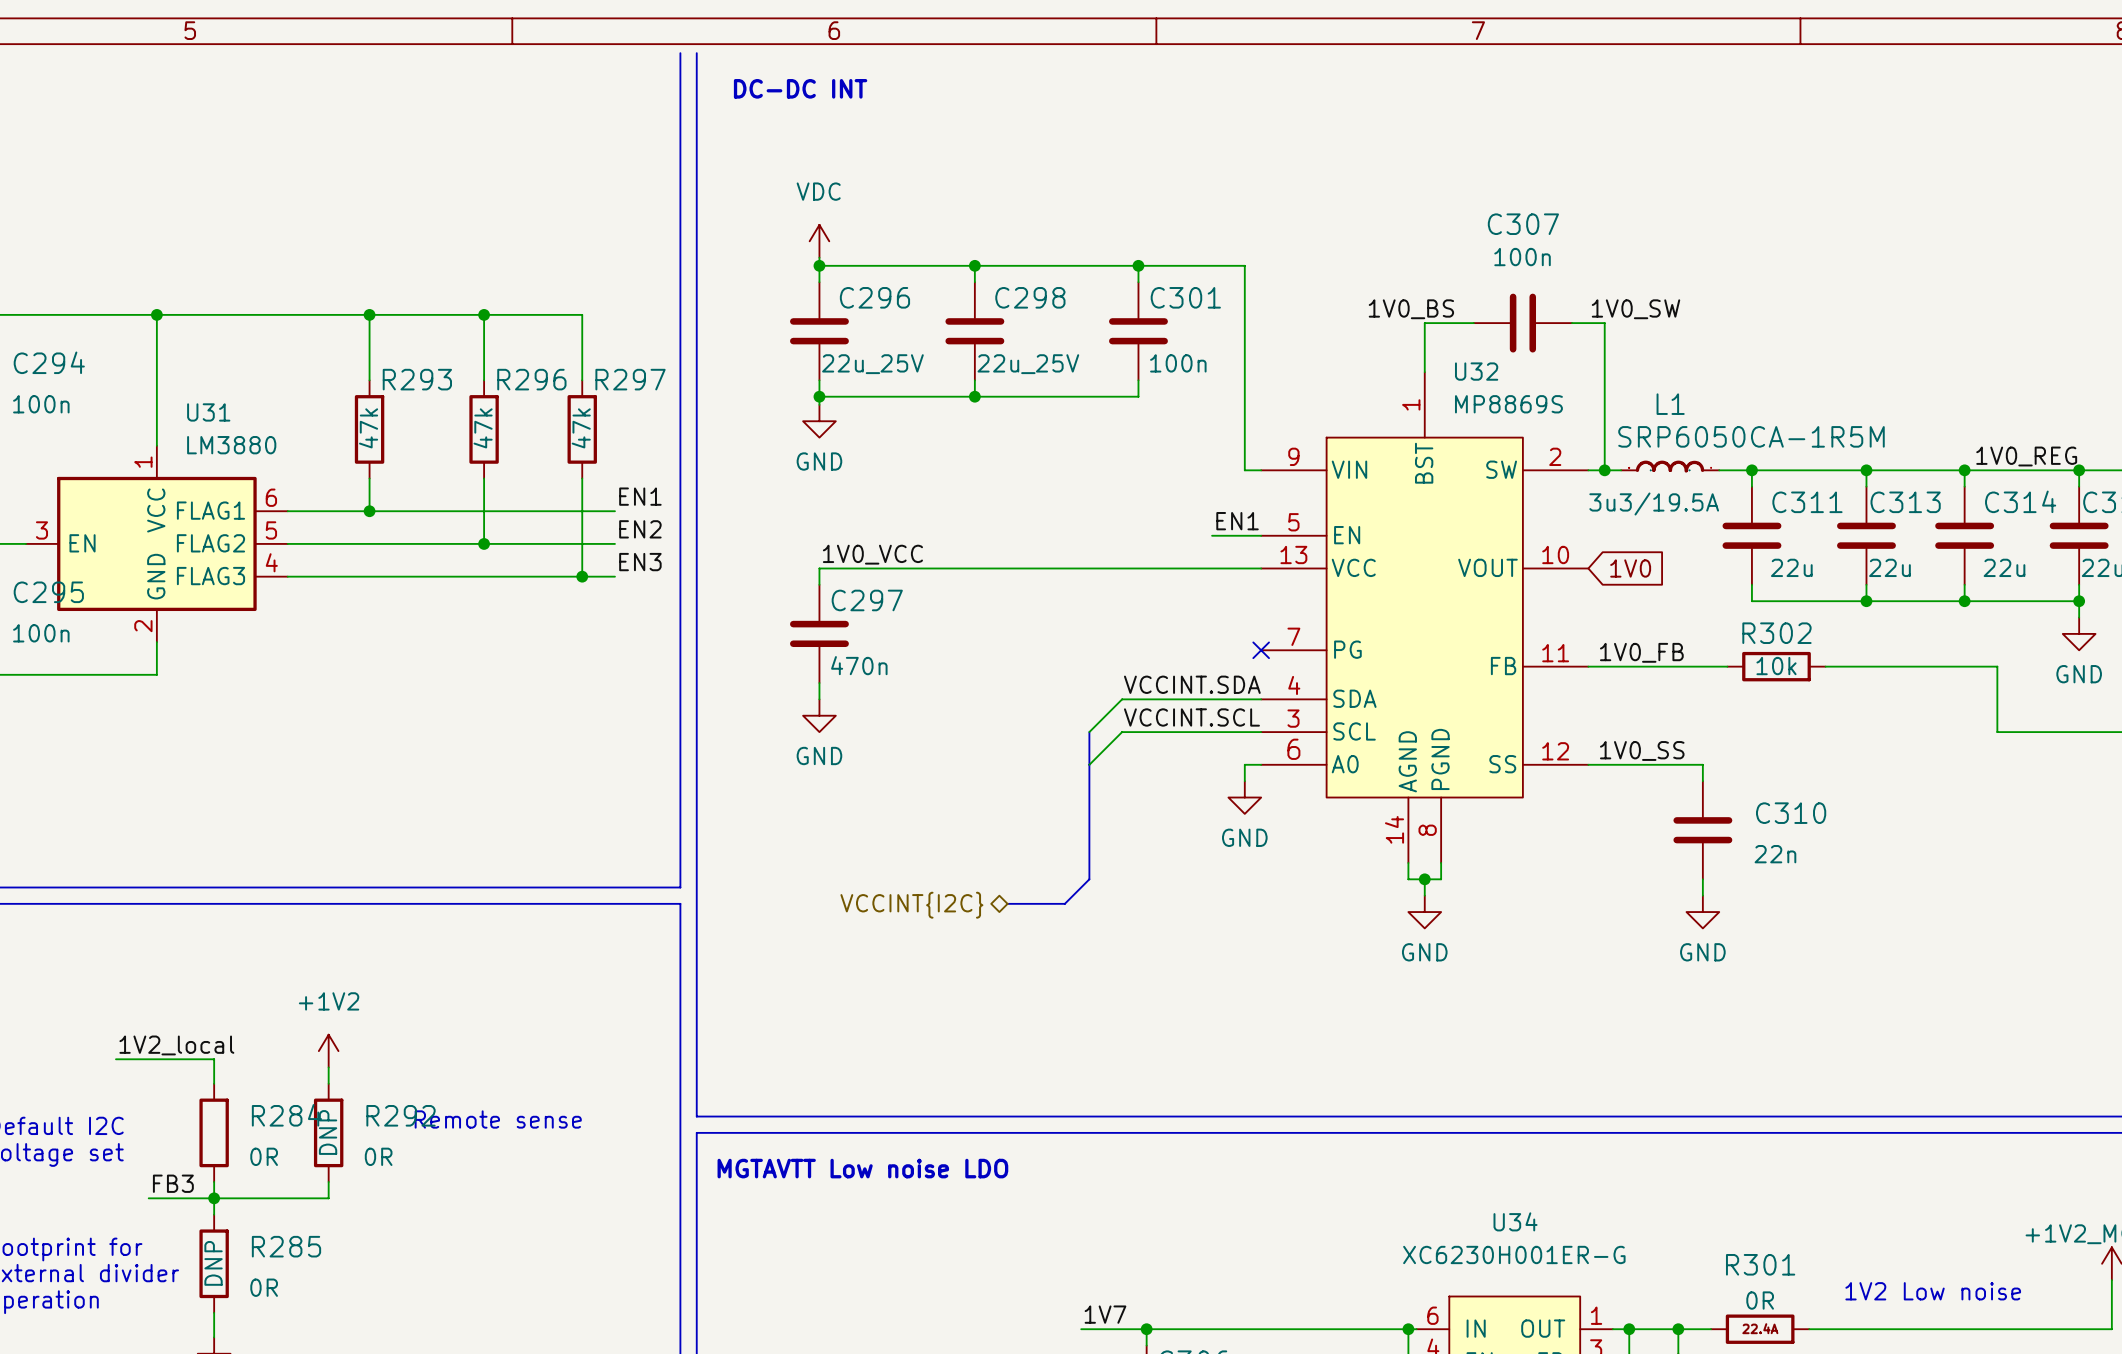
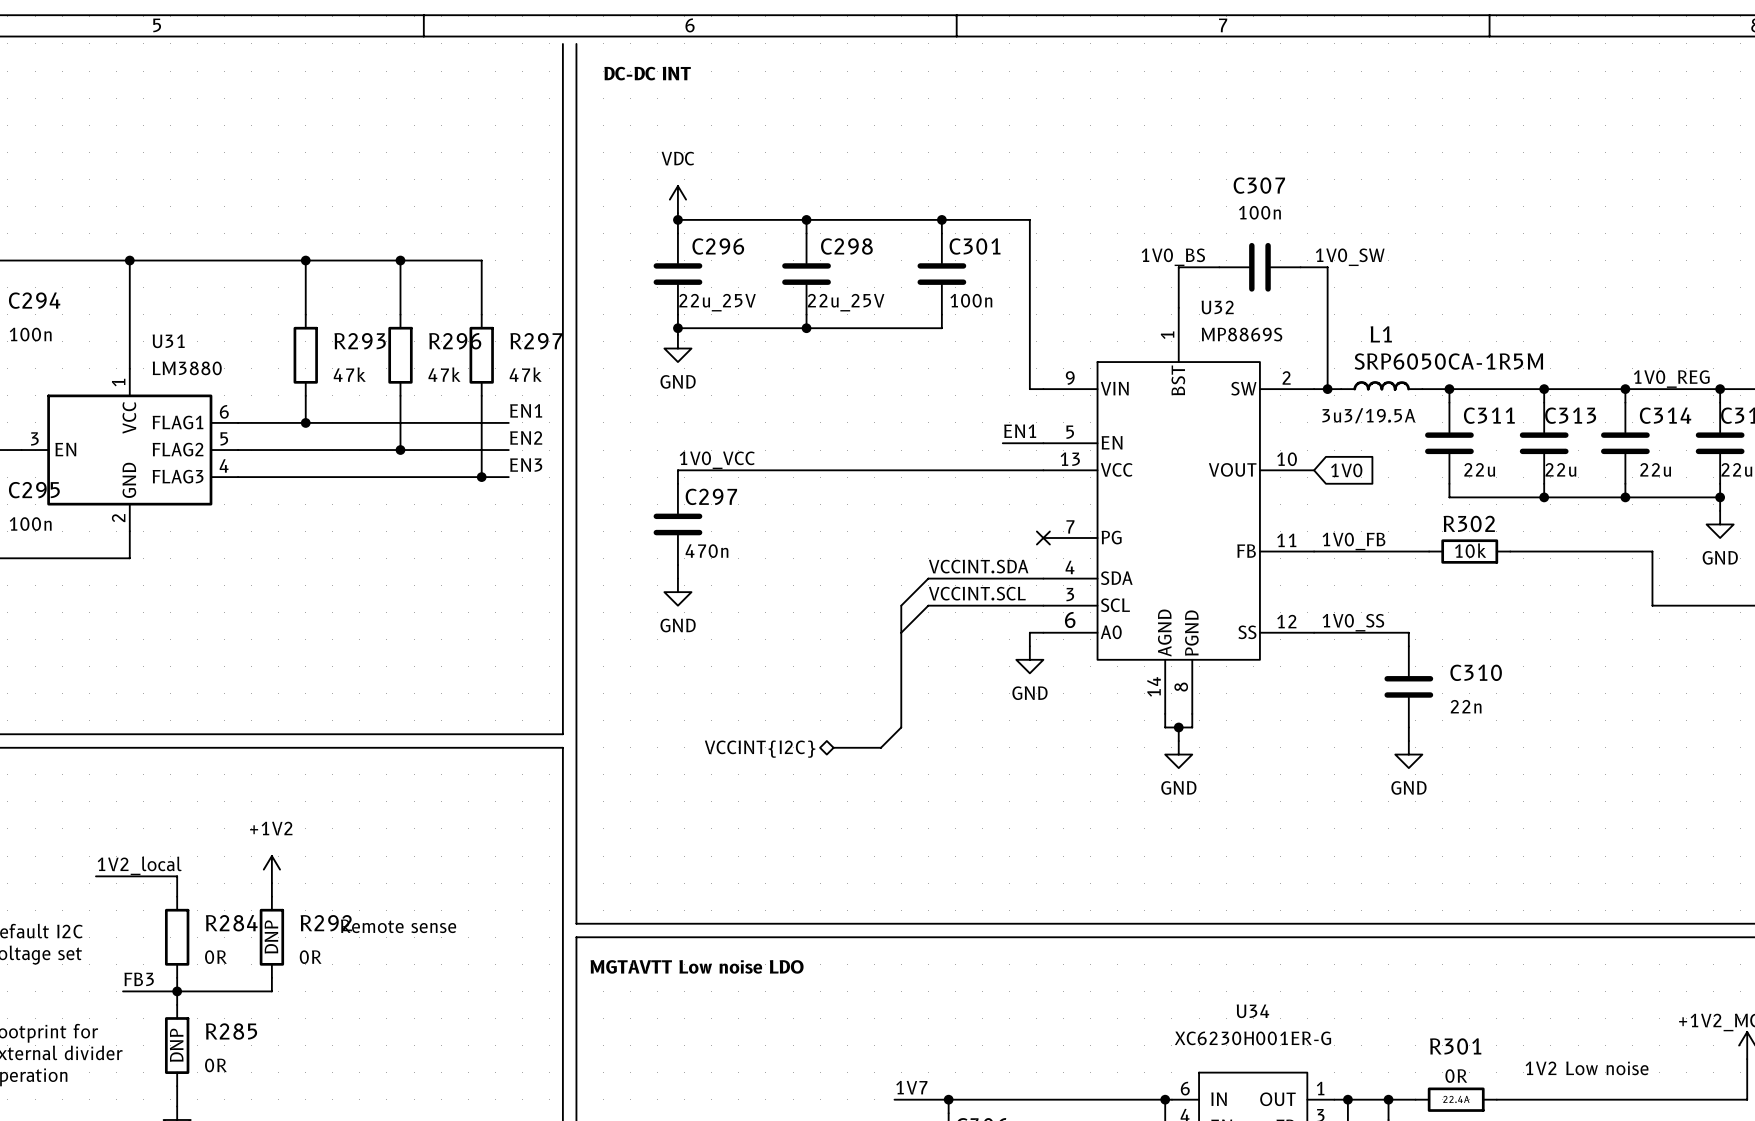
R293 name position: R293 (417, 379) -> R293 (360, 341)
R296 name position: R296 (531, 379) -> R296 (455, 341)
R297 name position: R297 (630, 379) -> R297 (536, 341)
R293 text rotation: 0° (368, 428) -> 90° clockwise (349, 374)
R293 text position: 47k (368, 428) -> 47k (349, 374)
R296 text rotation: 0° (483, 428) -> 90° clockwise (444, 374)
R296 text position: 47k (483, 428) -> 47k (444, 374)
R297 text rotation: 0° (581, 428) -> 90° clockwise (525, 374)
R297 text position: 47k (581, 428) -> 47k (525, 374)

